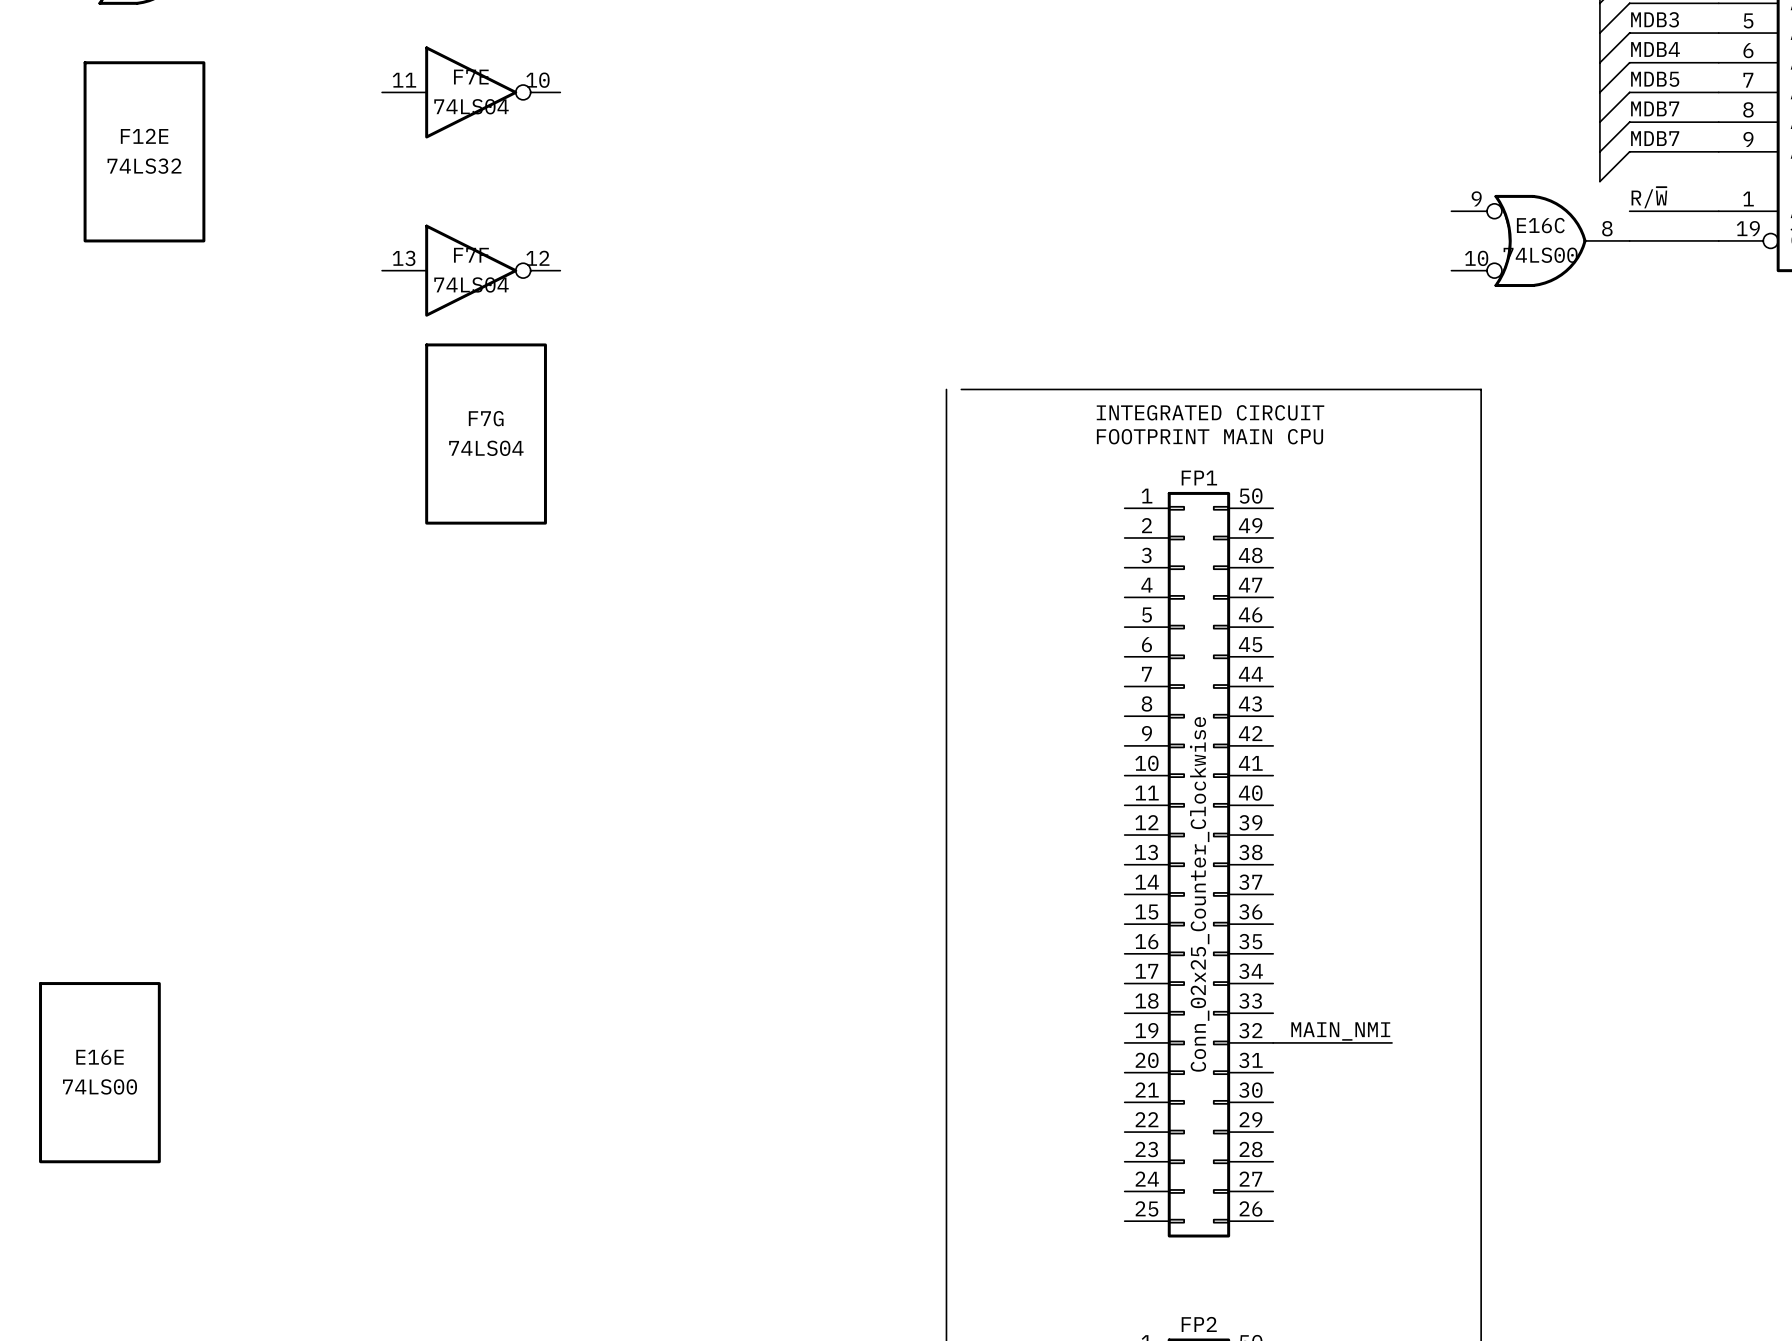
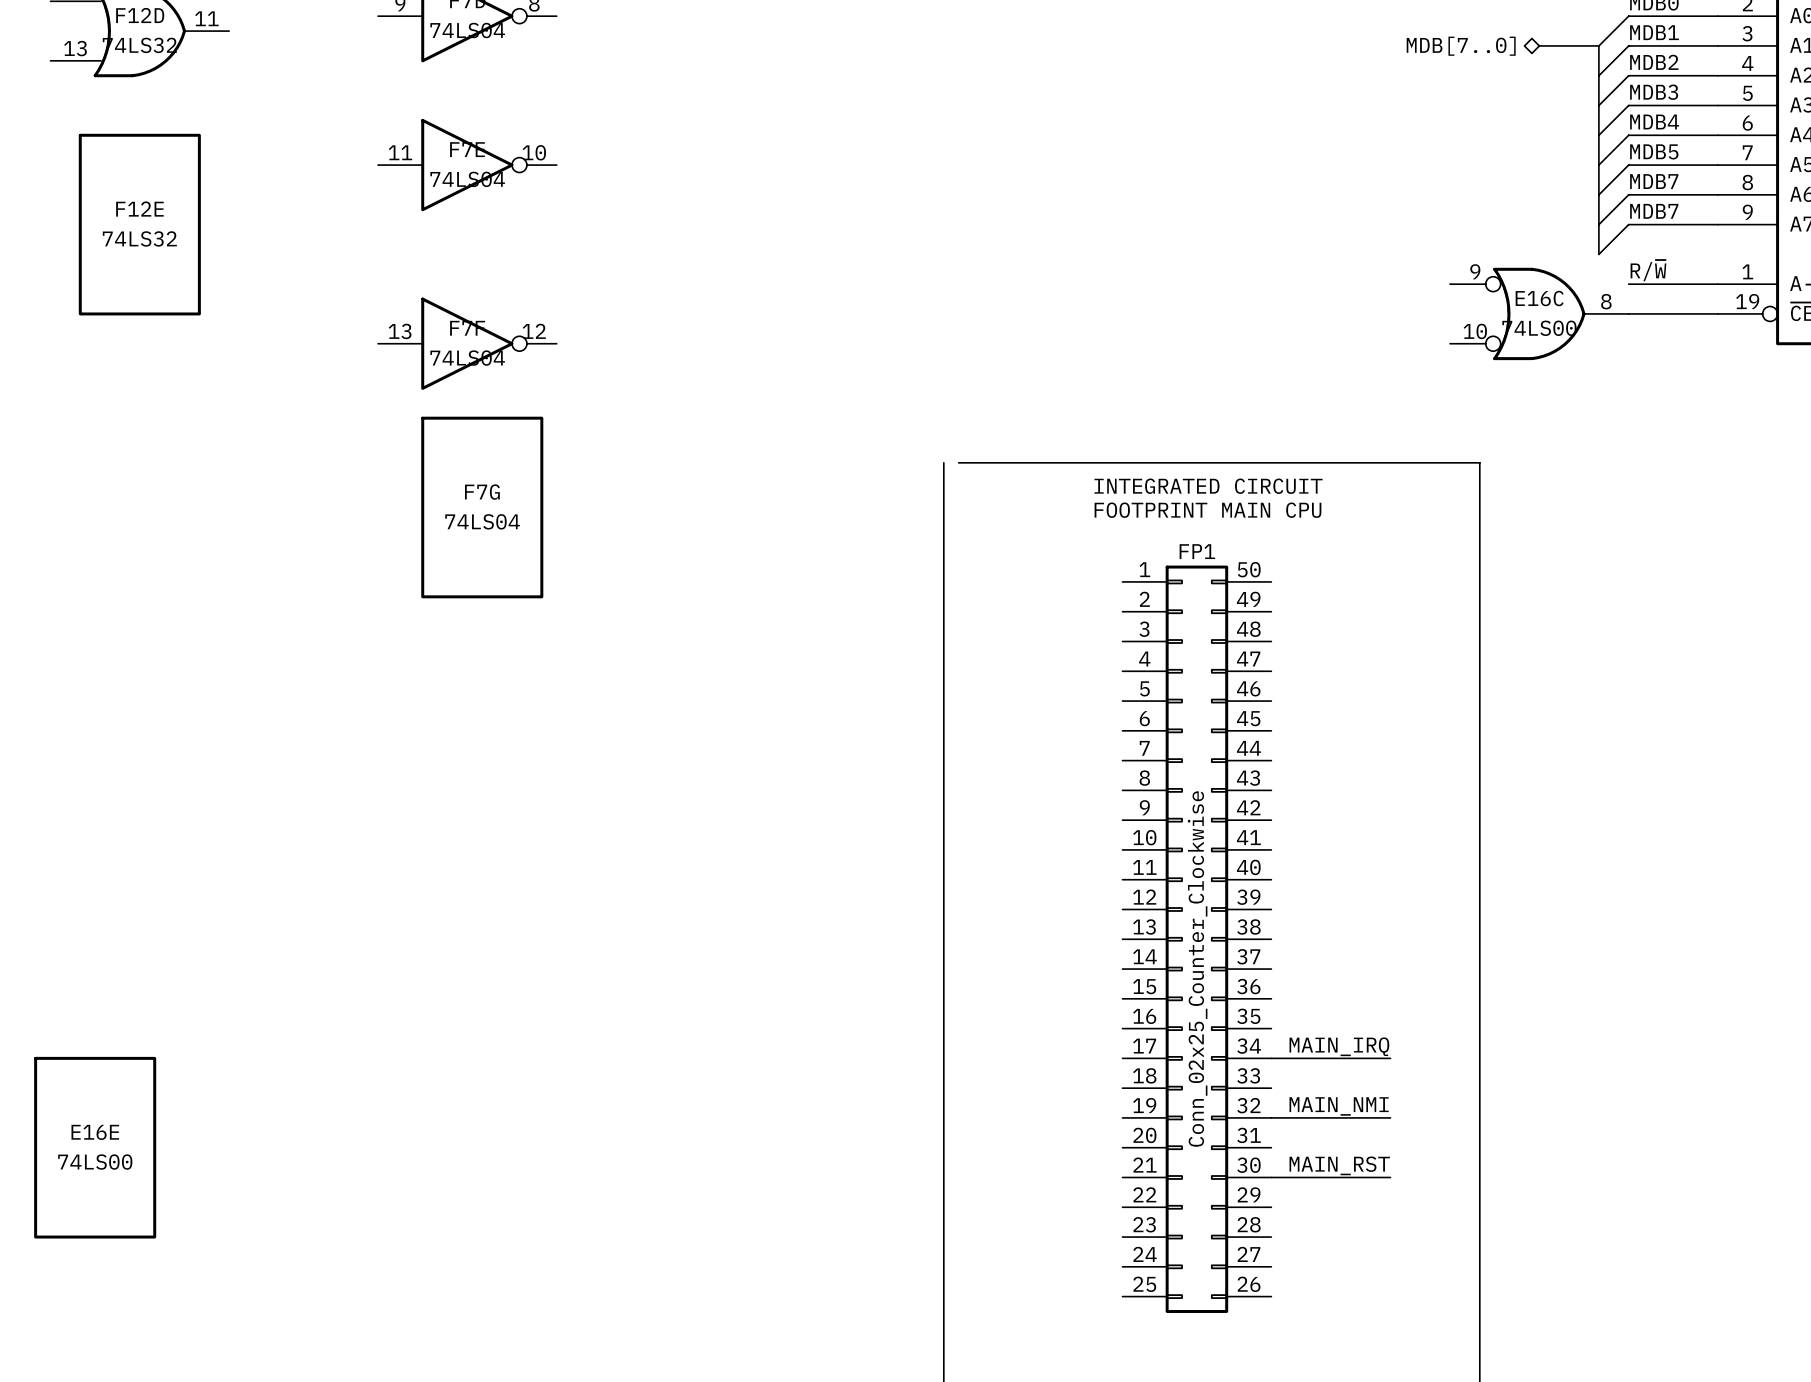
label: none -> MAIN_IRQ (1339, 1046)
wire: none -> (1271, 1058) (1390, 1058)
label: none -> MAIN_RST (1339, 1165)
wire: none -> (1271, 1177) (1390, 1177)

